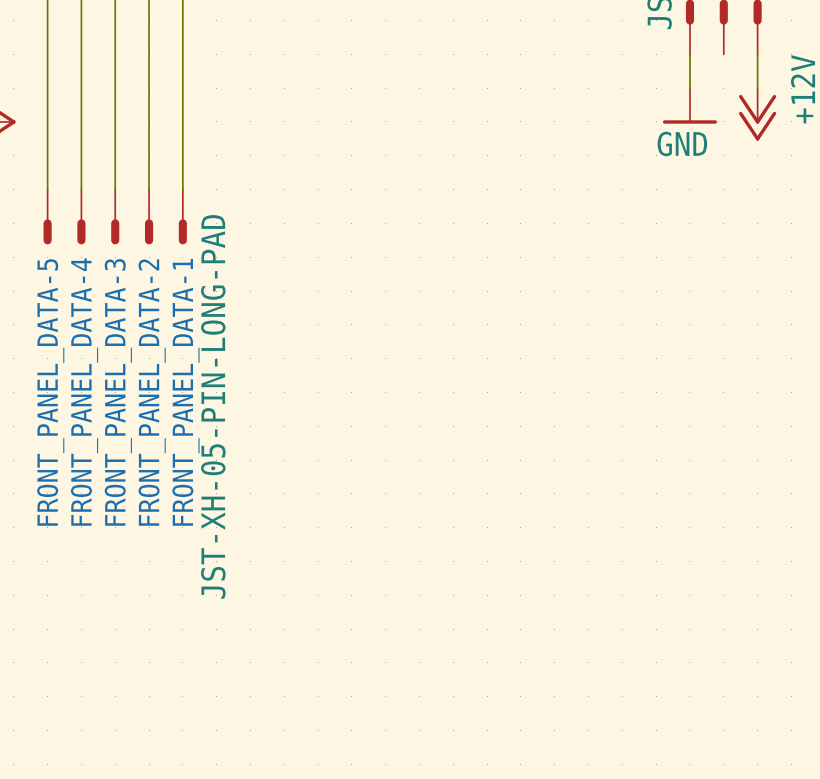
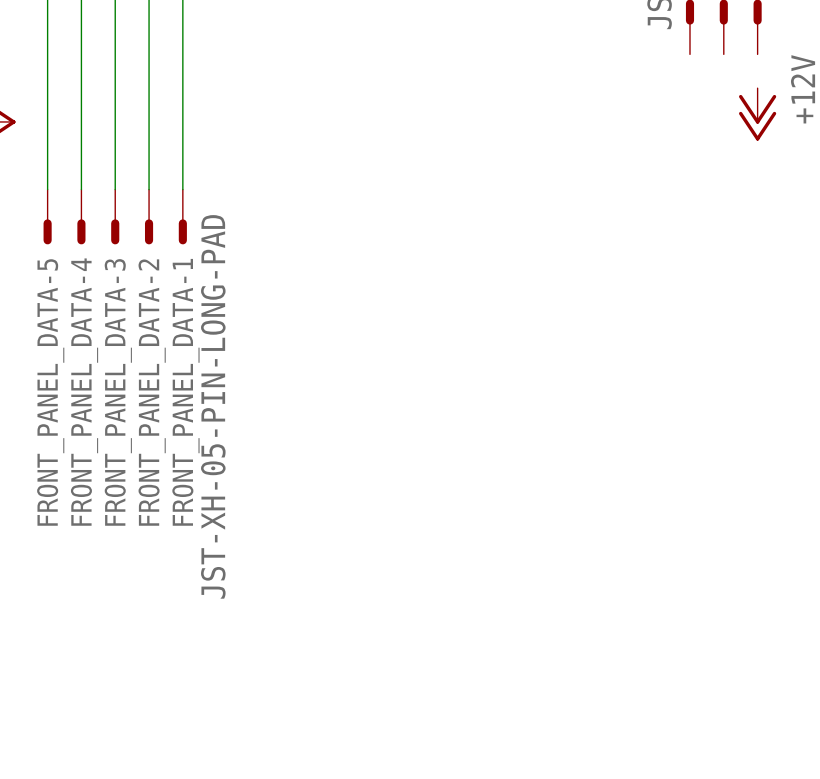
wire: (689, 54) (689, 88) -> none
wire: (757, 54) (757, 88) -> none
power symbol: GND (689, 105) -> none

